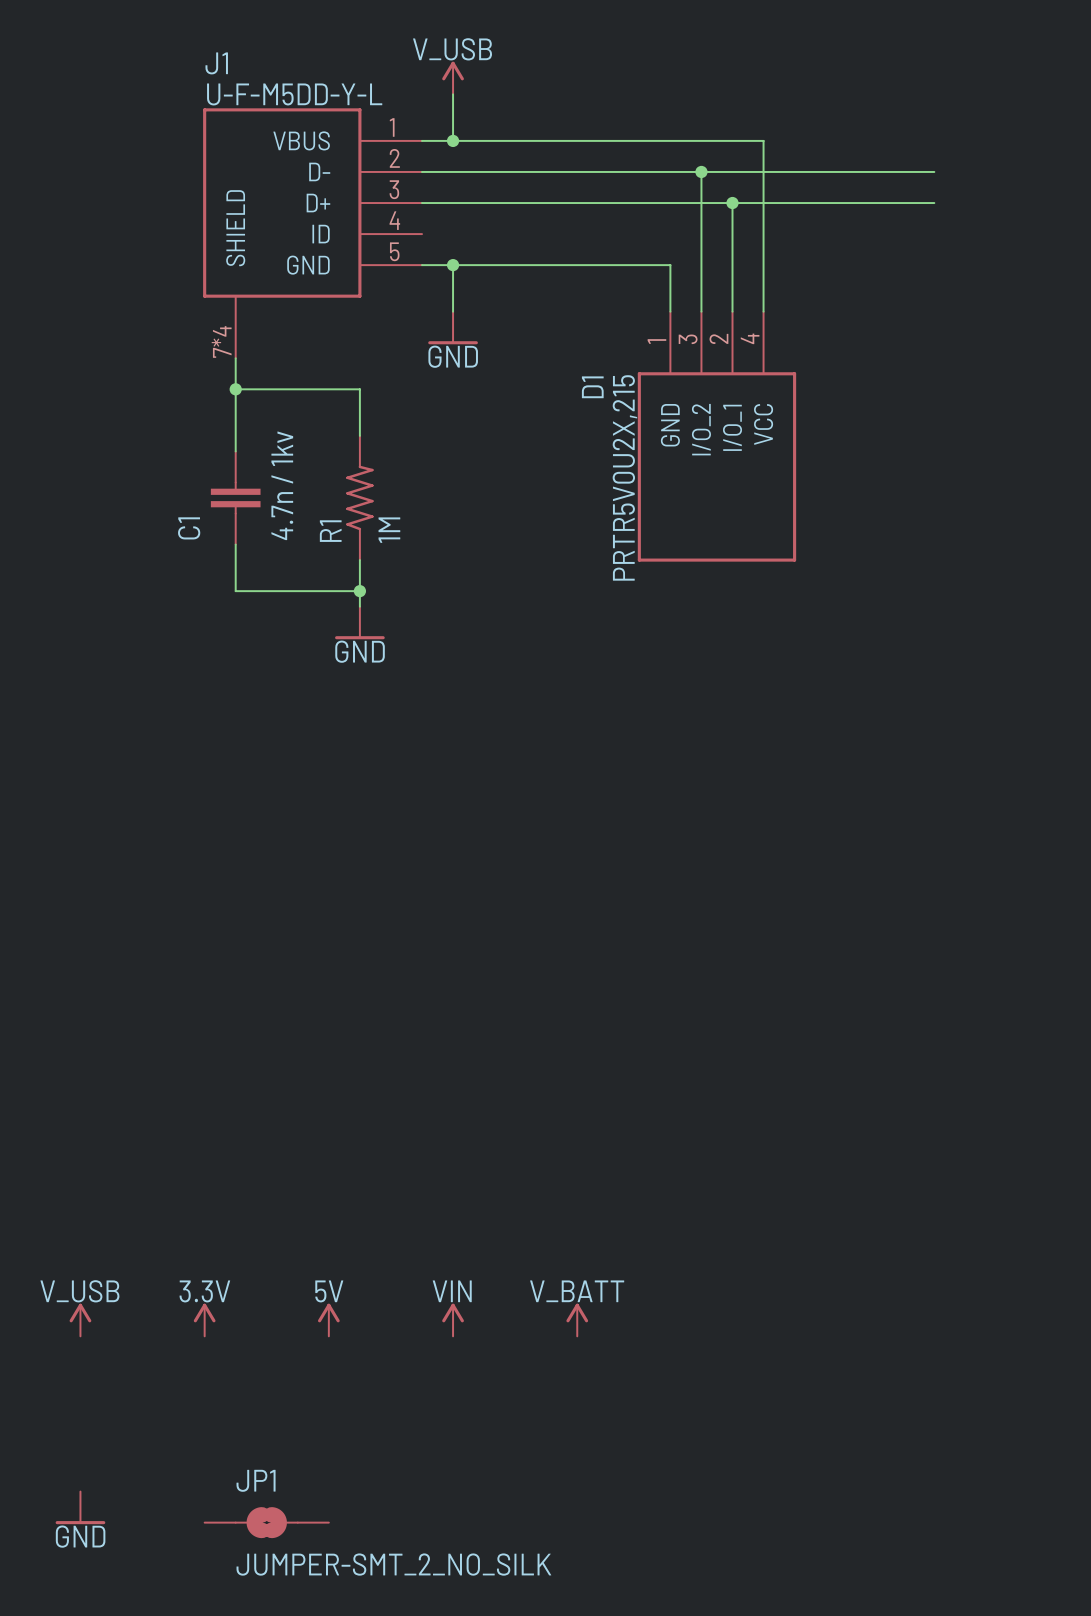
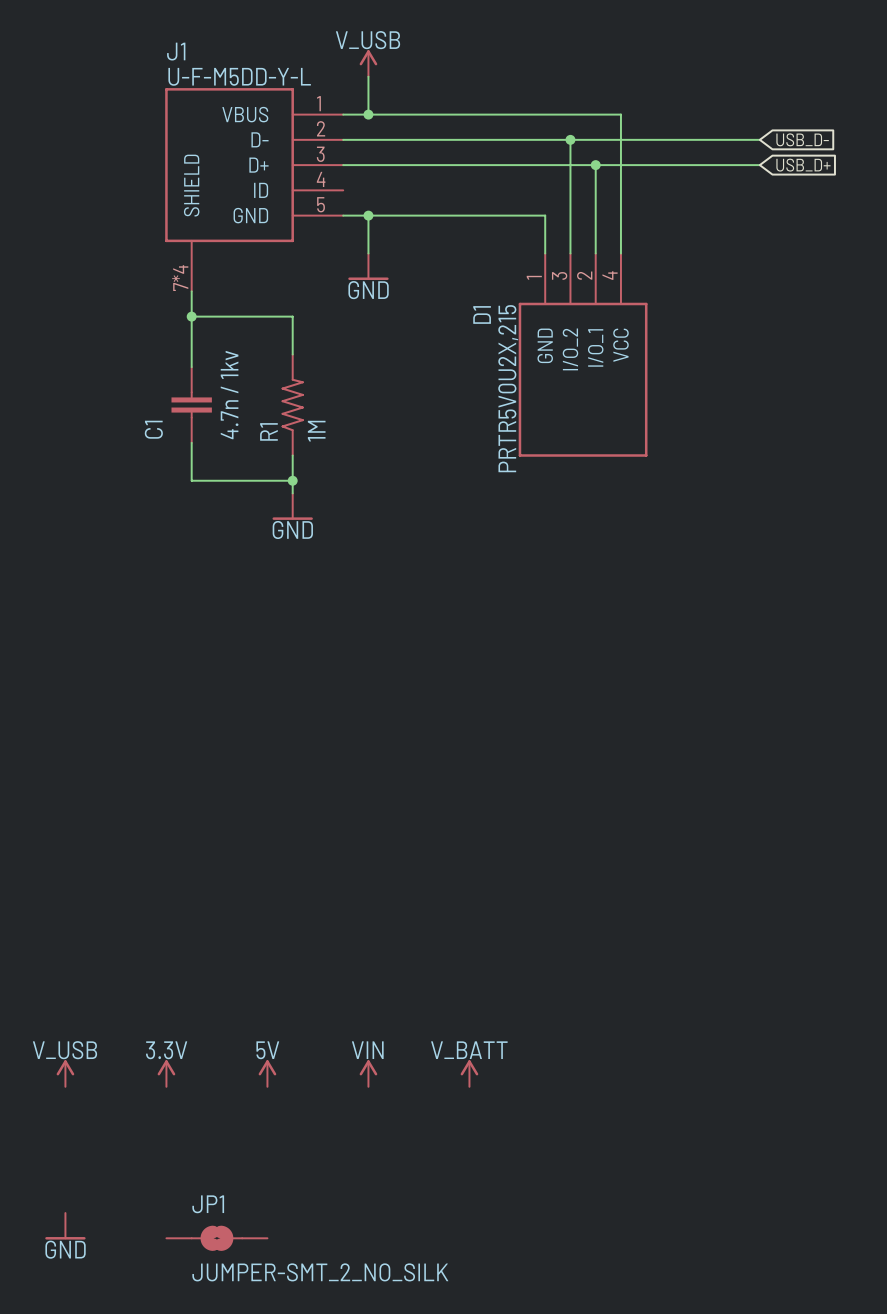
global label: none -> USB_D- (802, 139)
global label: none -> USB_D+ (803, 165)

